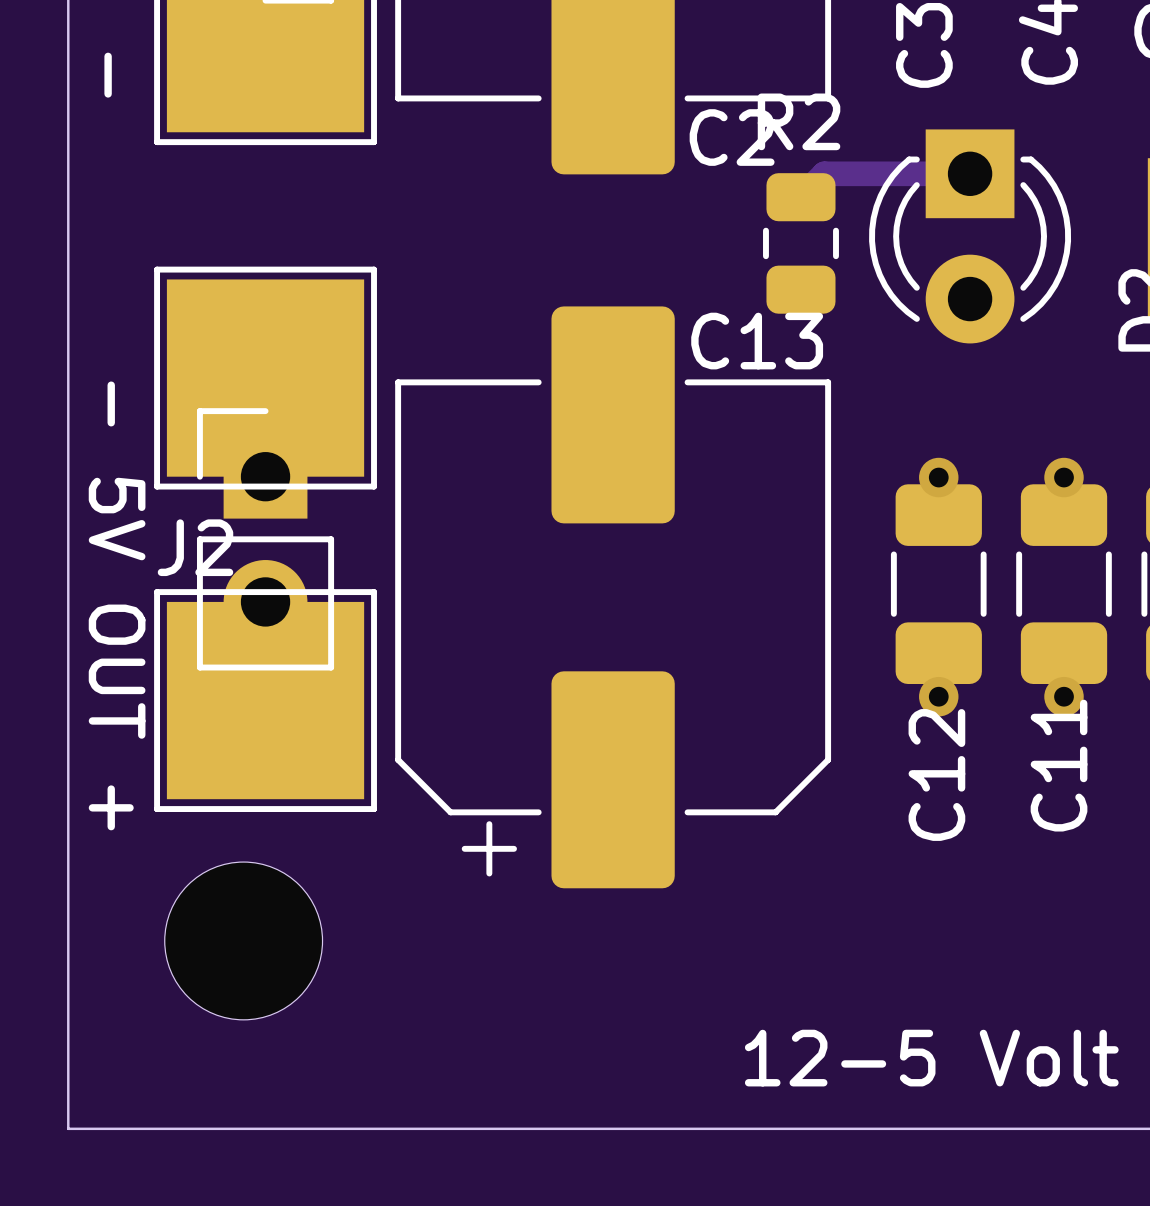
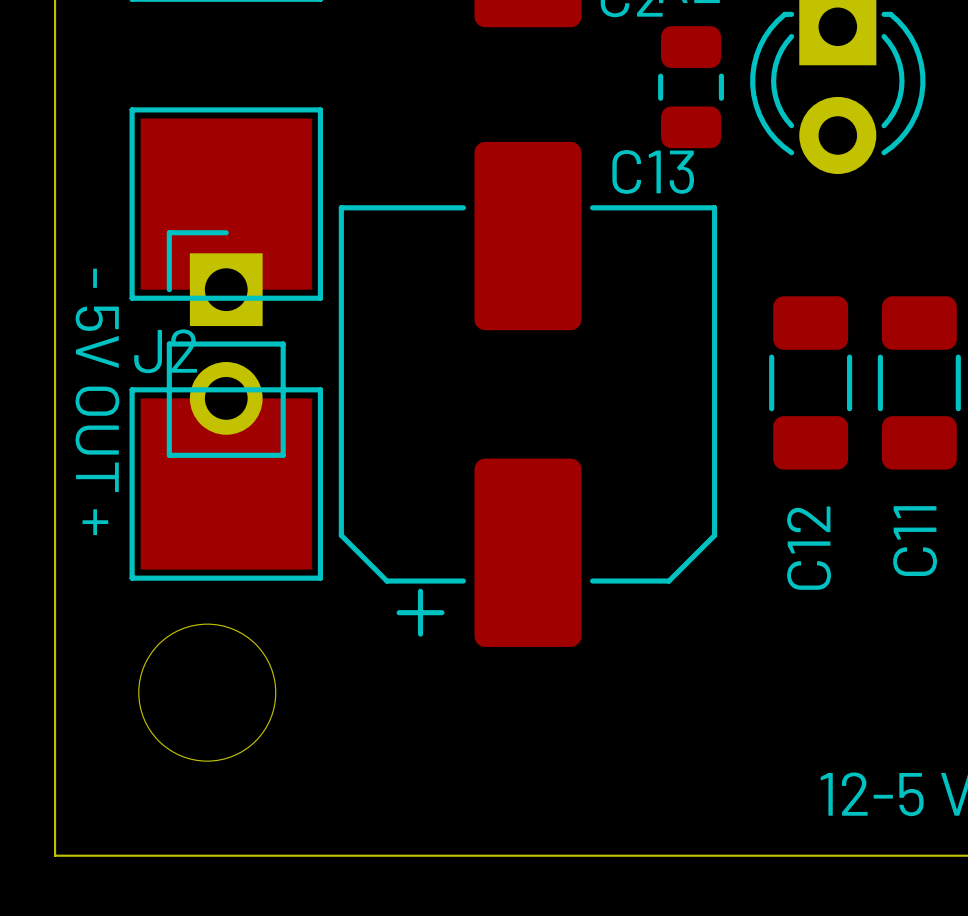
track: (970, 173) (824, 173) (800, 197) -> none
via: (938, 477) -> none
via: (1064, 477) -> none
via: (938, 696) -> none
via: (1064, 696) -> none

